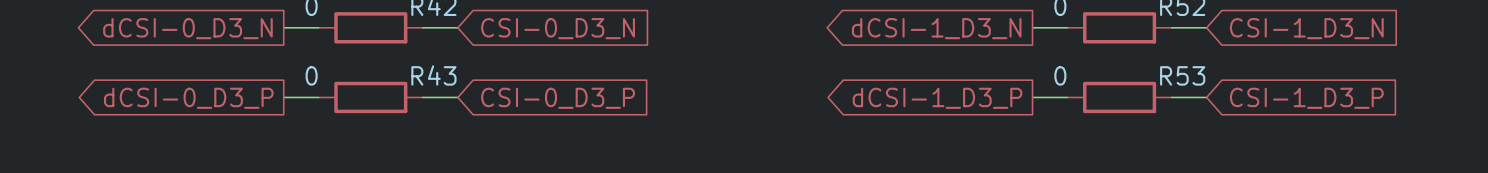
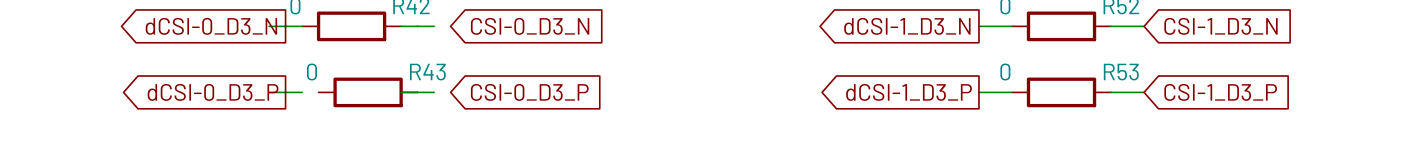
global label position: dCSI-0_D3_N (187, 28) -> dCSI-0_D3_N (211, 26)
global label position: CSI-0_D3_N (558, 28) -> CSI-0_D3_N (530, 26)
R43 position: (370, 97) -> (368, 92)
global label position: dCSI-0_D3_P (188, 98) -> dCSI-0_D3_P (213, 92)
global label position: CSI-0_D3_P (558, 98) -> CSI-0_D3_P (529, 92)

